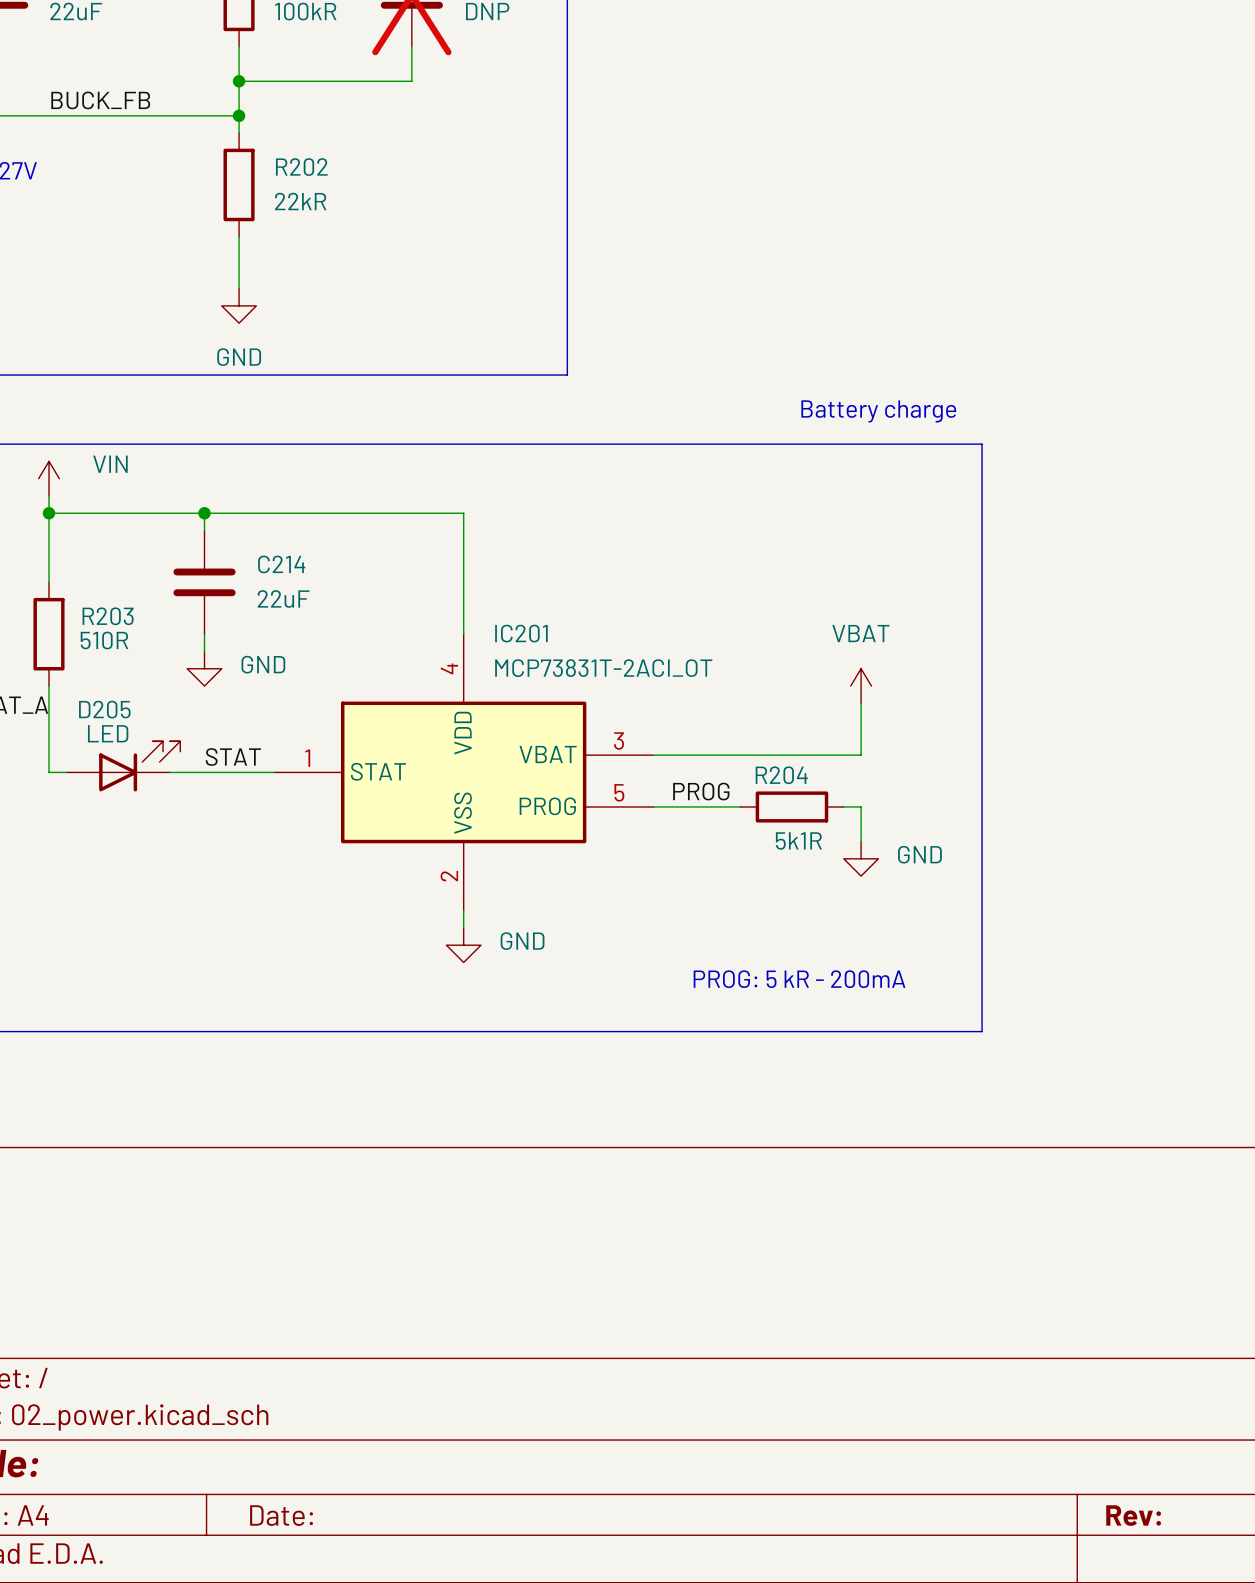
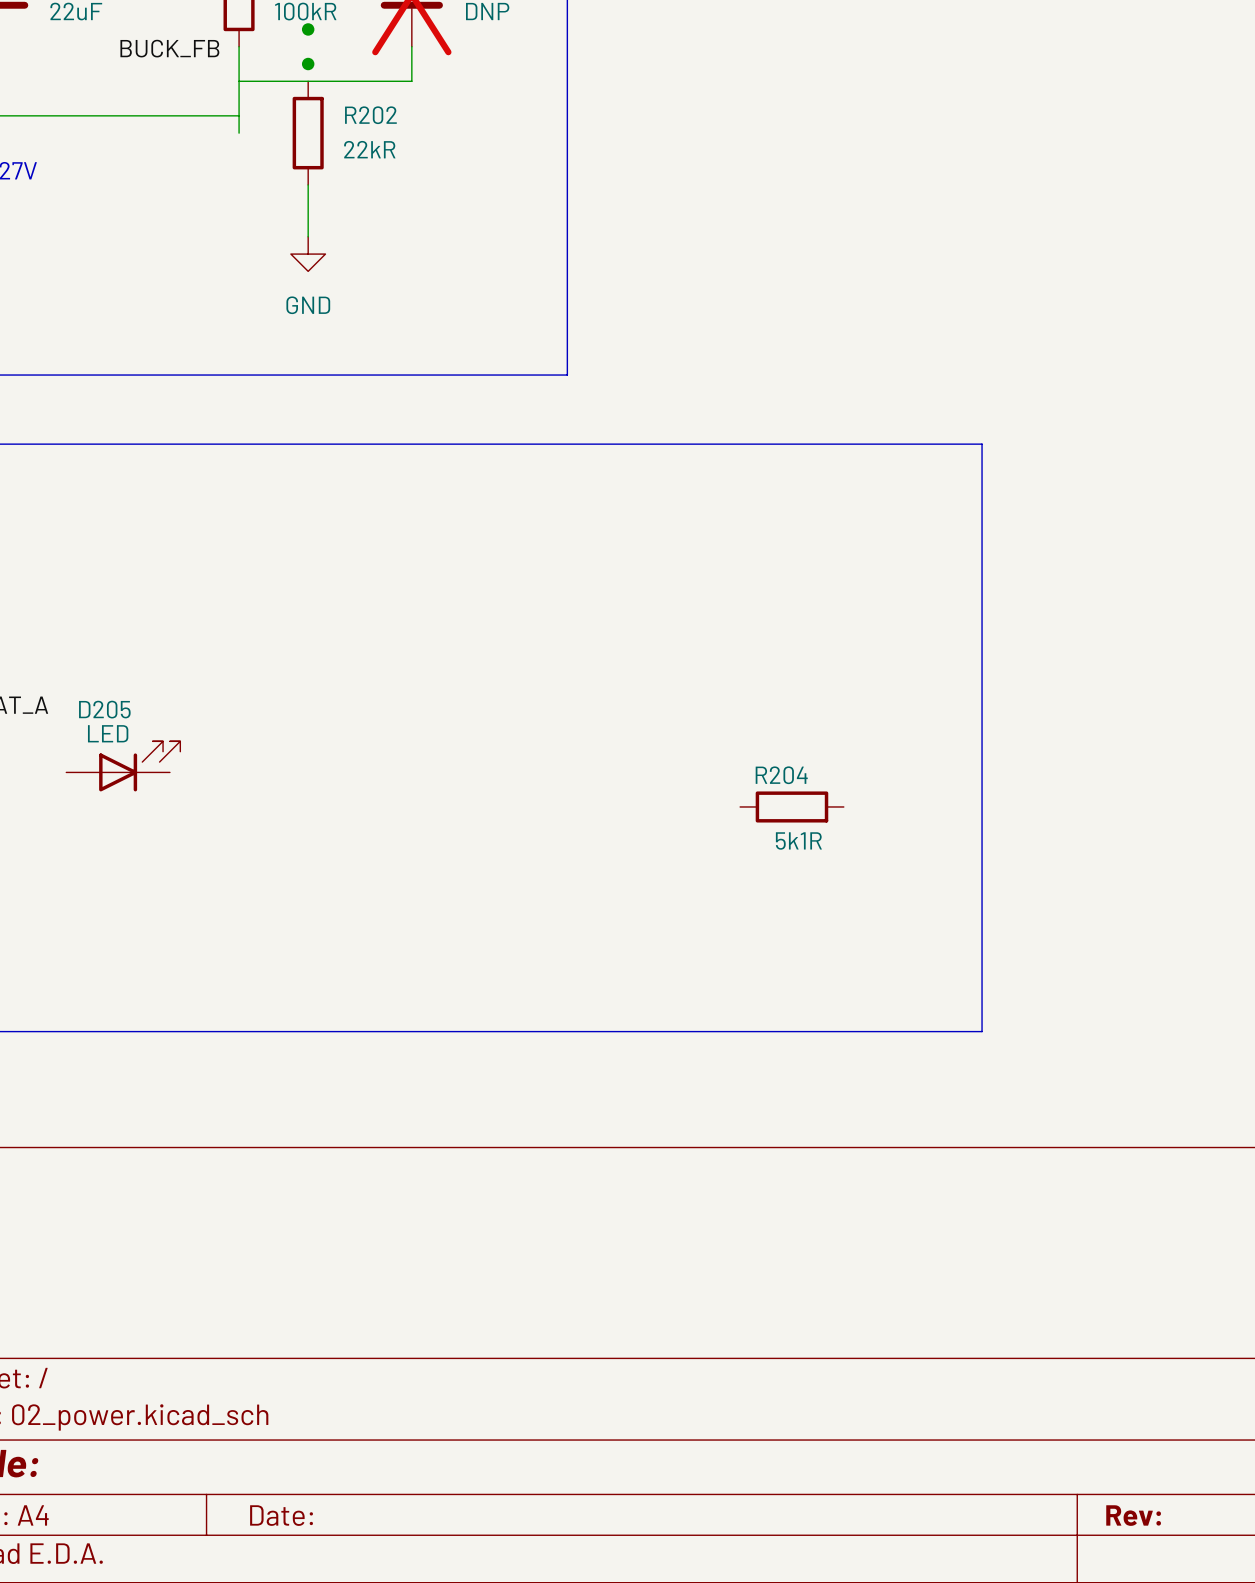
junction: none -> (308, 29)
junction: none -> (308, 64)
junction: (239, 81) -> none
label position: BUCK_FB (100, 100) -> BUCK_FB (169, 48)
junction: (239, 115) -> none
R202 position: (239, 184) -> (308, 133)
wire: (239, 236) (239, 288) -> (308, 184) (308, 236)
power symbol position: GND (239, 305) -> GND (308, 254)
text: Battery charge (878, 411) -> none
power symbol: VIN (49, 478) -> none
wire: (49, 495) (49, 582) -> none
wire: (49, 513) (463, 513) (463, 634) -> none
junction: (49, 513) -> none
wire: (204, 513) (204, 530) -> none
junction: (204, 513) -> none
C214: 22uF (204, 582) -> none
R203: 510R (49, 634) -> none
wire: (204, 634) (204, 651) -> none
power symbol: GND (204, 668) -> none
wire: (49, 686) (49, 772) (66, 772) -> none
power symbol: VBAT (861, 686) -> none
wire: (861, 703) (861, 755) (653, 755) -> none
label: STAT (233, 757) -> none
wire: (169, 772) (273, 772) -> none
IC201: MCP73831T-2ACI_OT (463, 772) -> none
label: PROG (701, 791) -> none
wire: (653, 806) (740, 806) -> none
wire: (843, 806) (861, 806) (861, 841) -> none
power symbol: GND (861, 858) -> none
wire: (463, 910) (463, 927) -> none
power symbol: GND (463, 945) -> none
text: PROG: 5 kR - 200mA (799, 979) -> none

